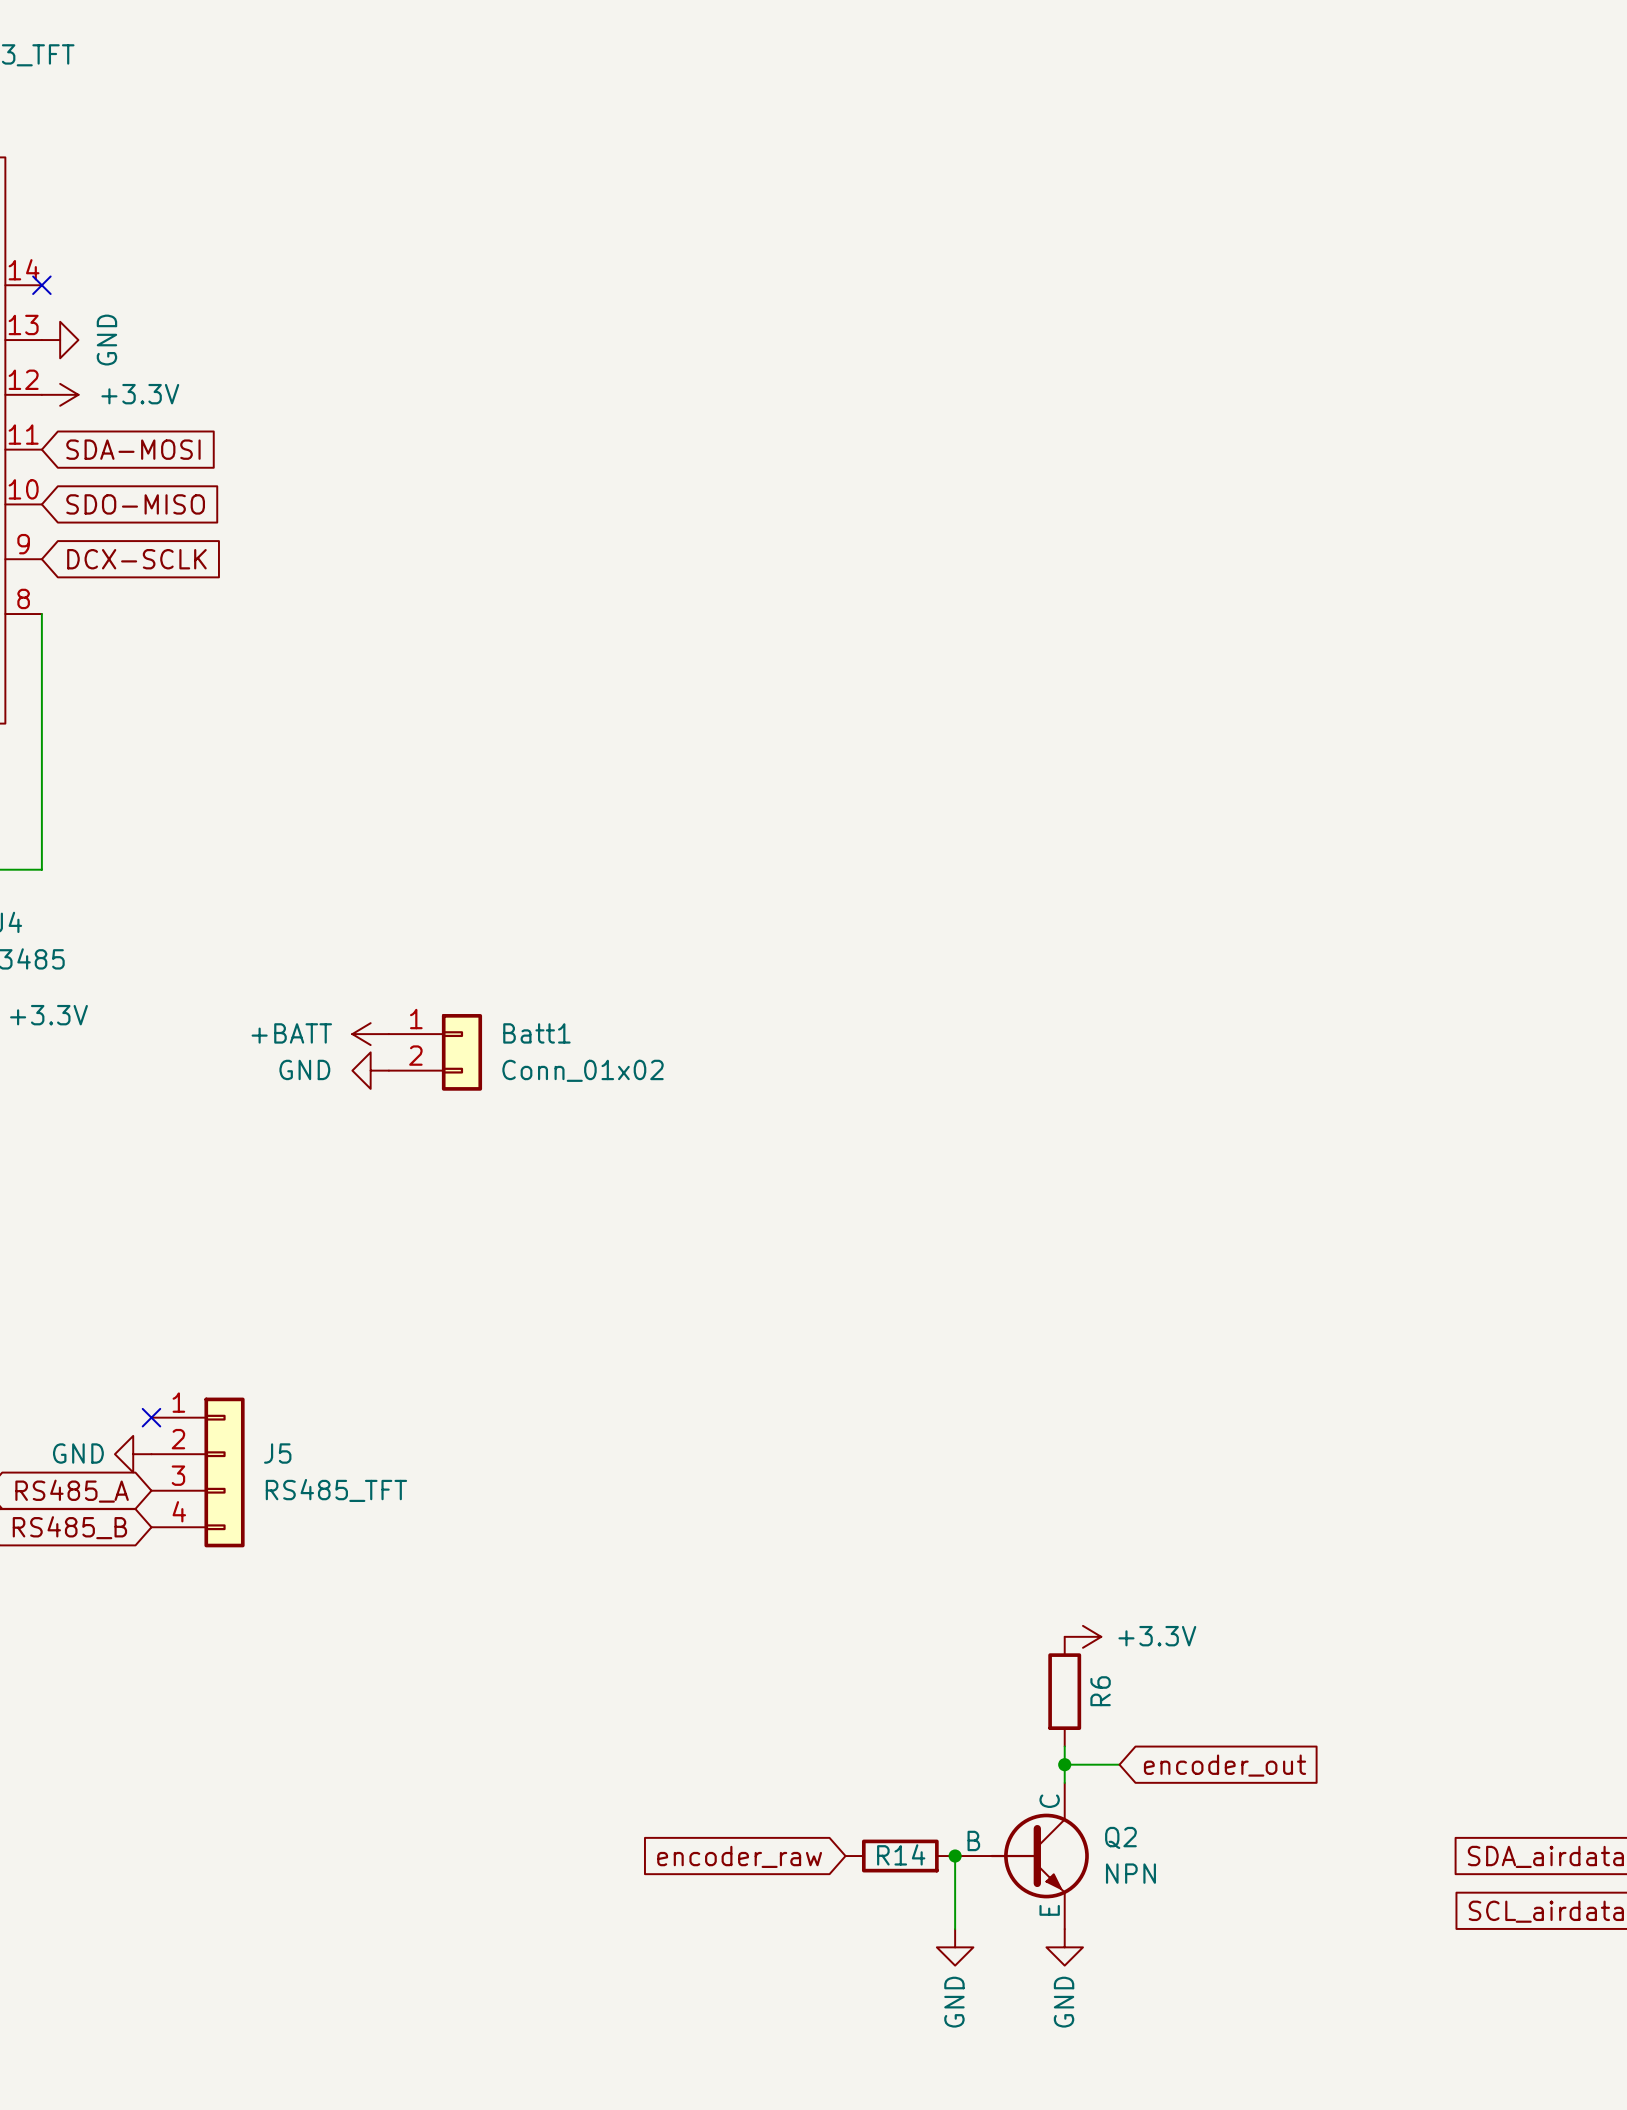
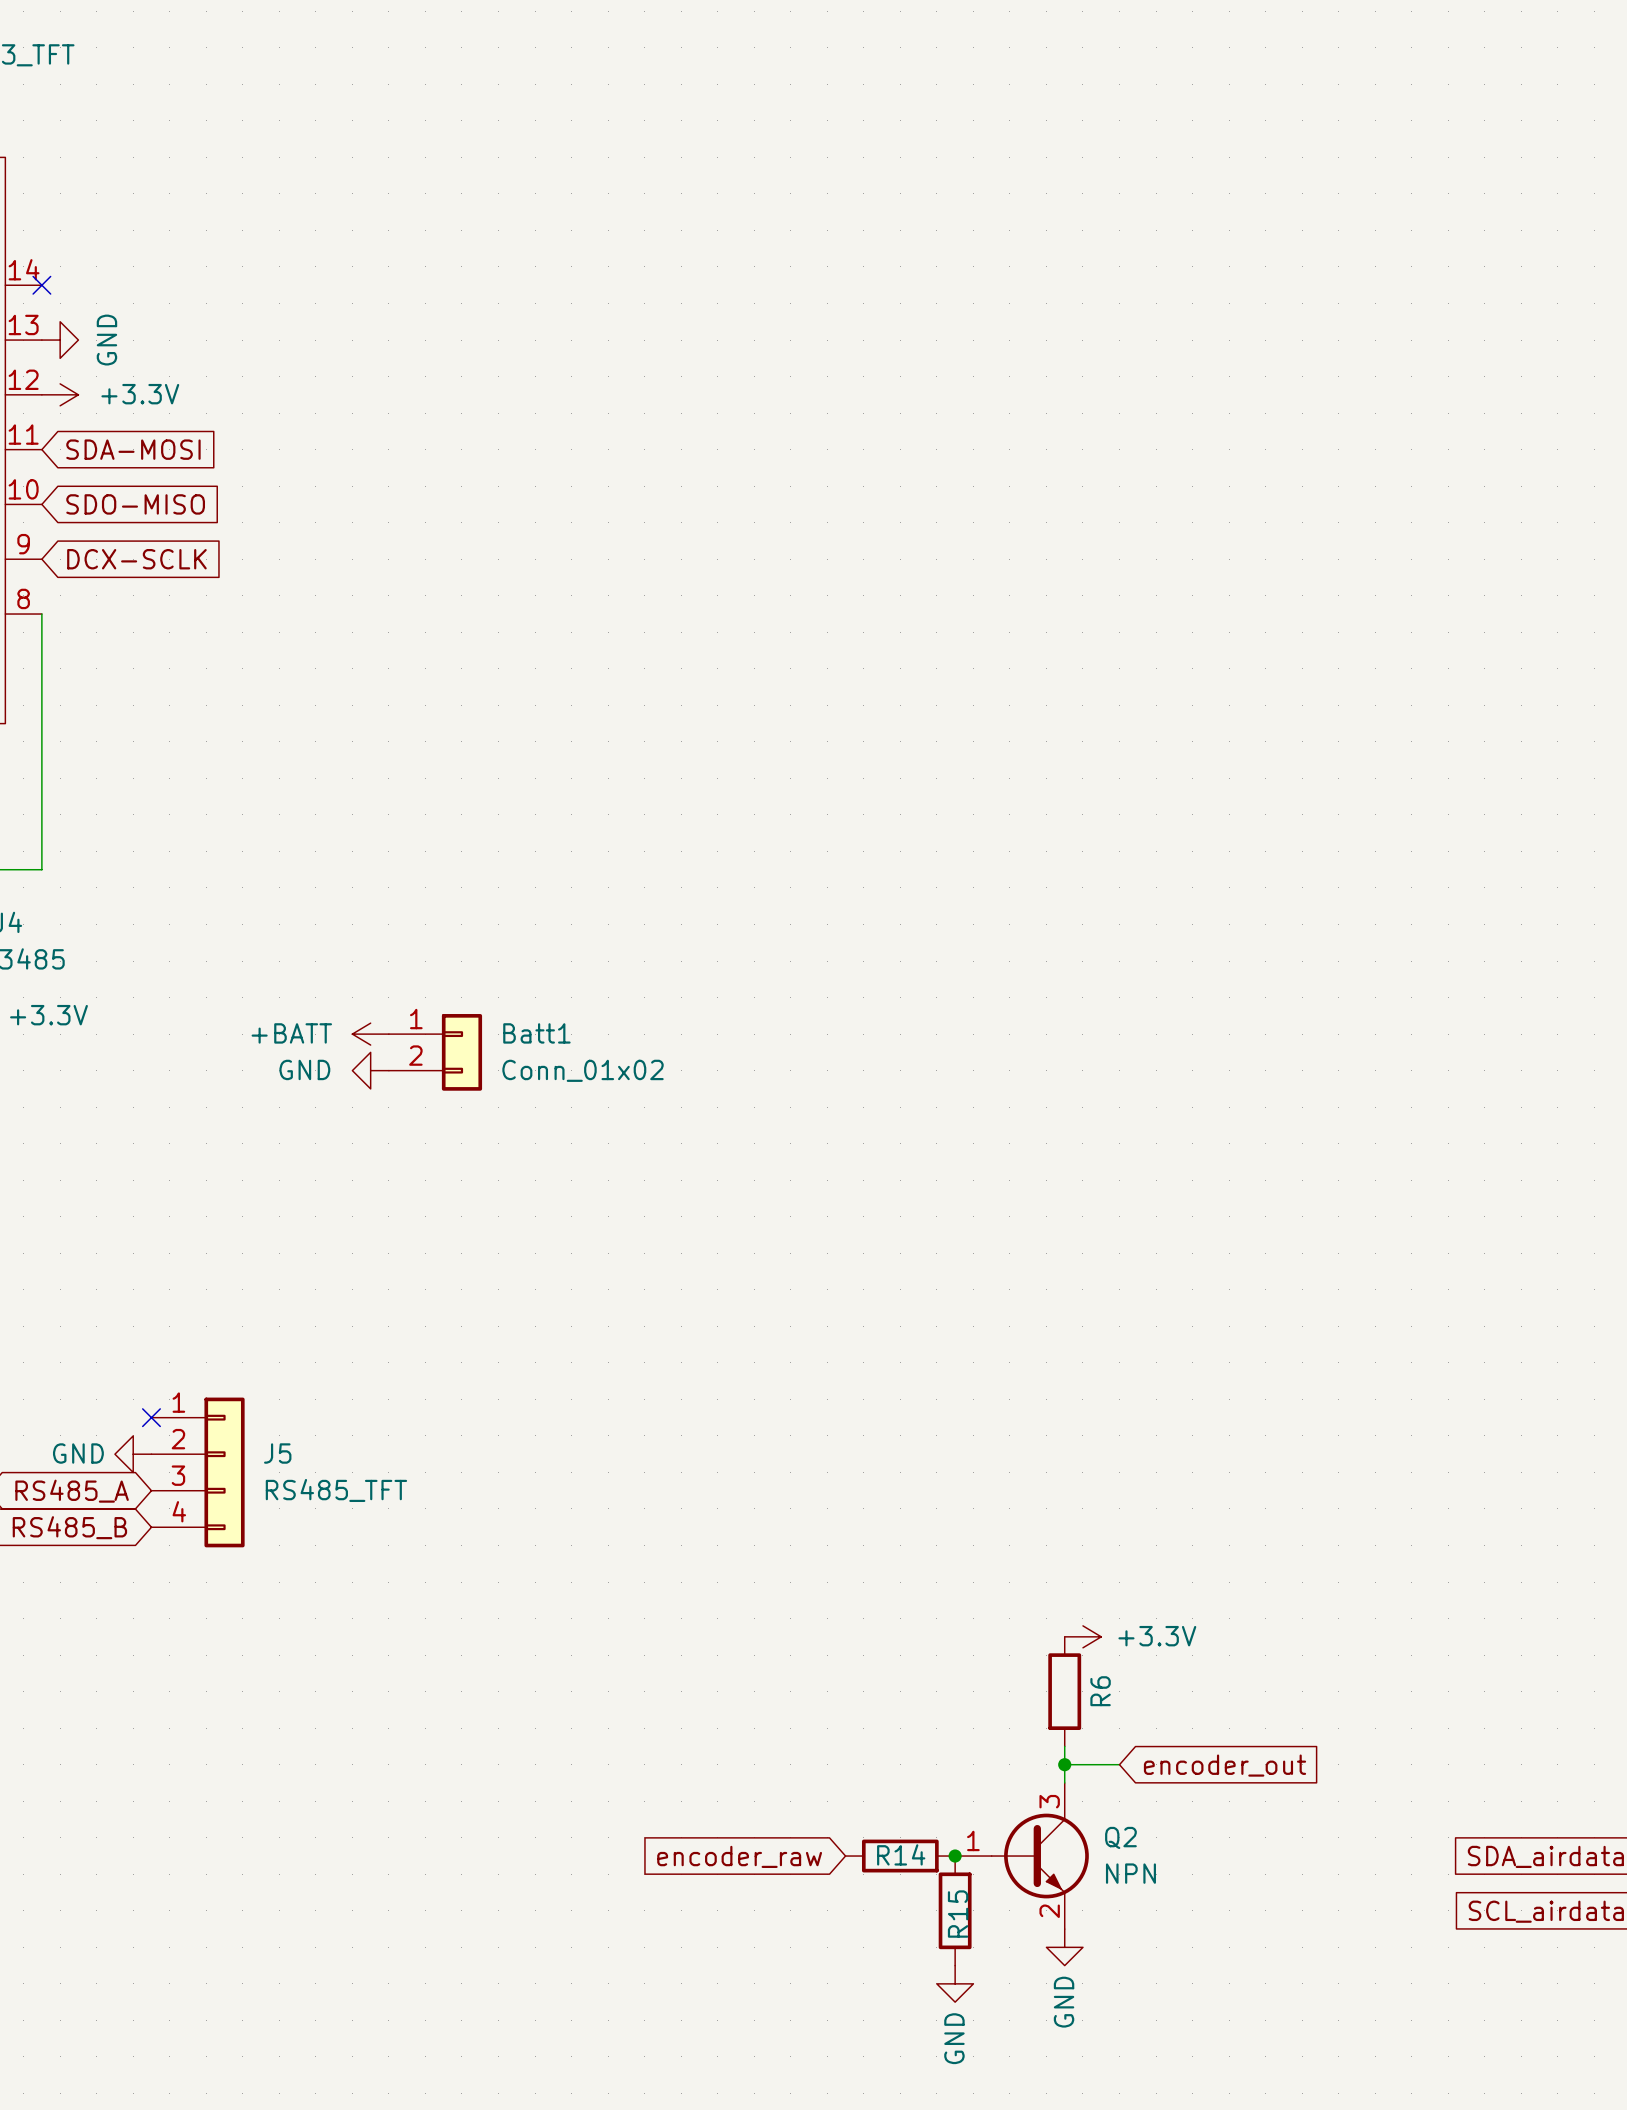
Q2 symbol: [955, 1782, 1089, 1930] -> [955, 1782, 1089, 1930]
wire: (955, 1856) (955, 1929) -> none
R15: none -> (955, 1910)
power symbol position: GND (955, 1947) -> GND (955, 1983)

